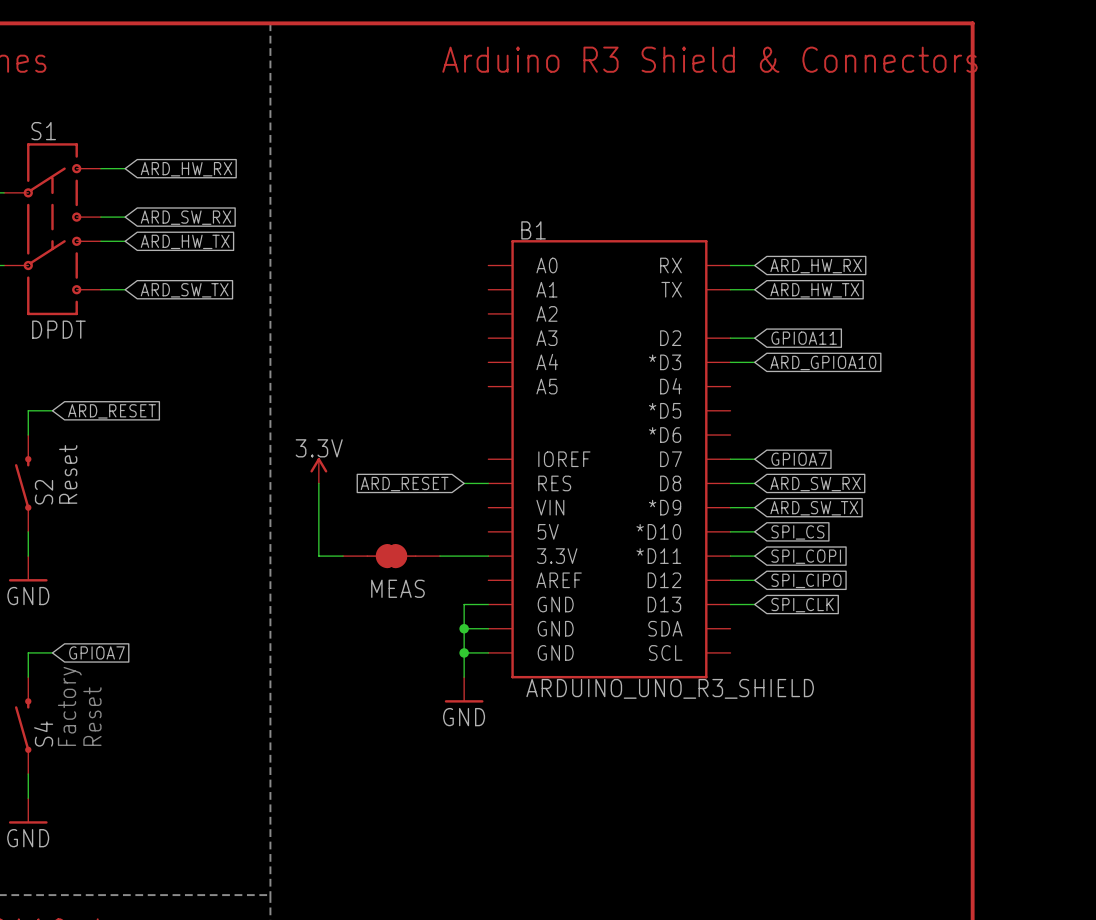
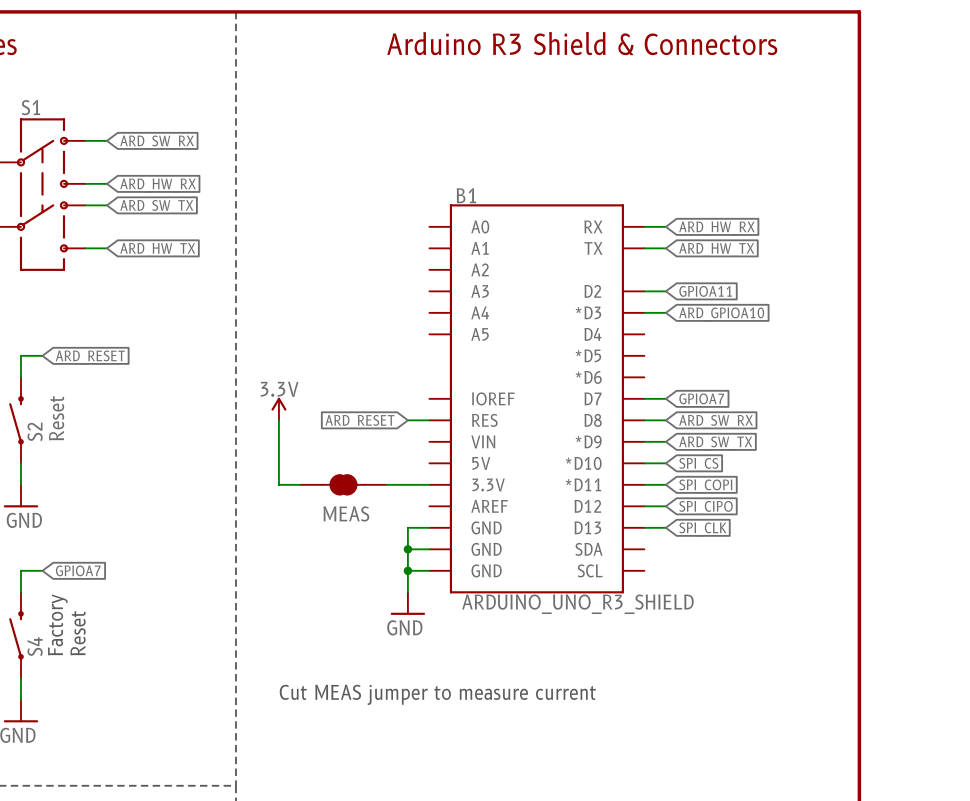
global label: ARD_HW_RX (186, 169) -> ARD_SW_RX (157, 142)
global label: ARD_SW_RX (185, 217) -> ARD_HW_RX (158, 185)
global label: ARD_HW_TX (185, 241) -> ARD_SW_TX (156, 206)
global label: ARD_SW_TX (184, 290) -> ARD_HW_TX (157, 249)
S1 value: DPDT (58, 329) -> none
text: none -> Cut MEAS jumper to measure current (437, 694)

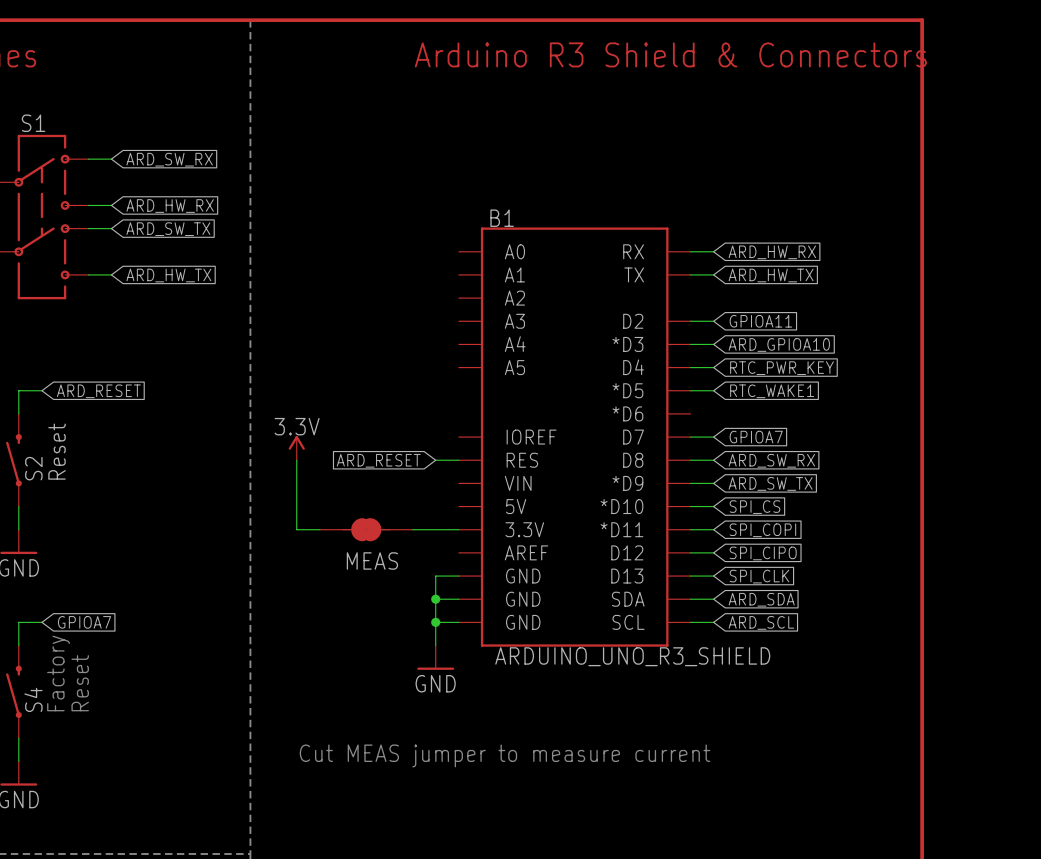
wire: none -> (690, 367) (713, 367)
global label: none -> RTC_PWR_KEY (782, 368)
wire: none -> (690, 390) (713, 390)
global label: none -> RTC_WAKE1 (772, 391)
wire: none -> (690, 599) (713, 599)
global label: none -> ARD_SDA (761, 599)
wire: none -> (690, 622) (713, 622)
global label: none -> ARD_SCL (761, 622)

